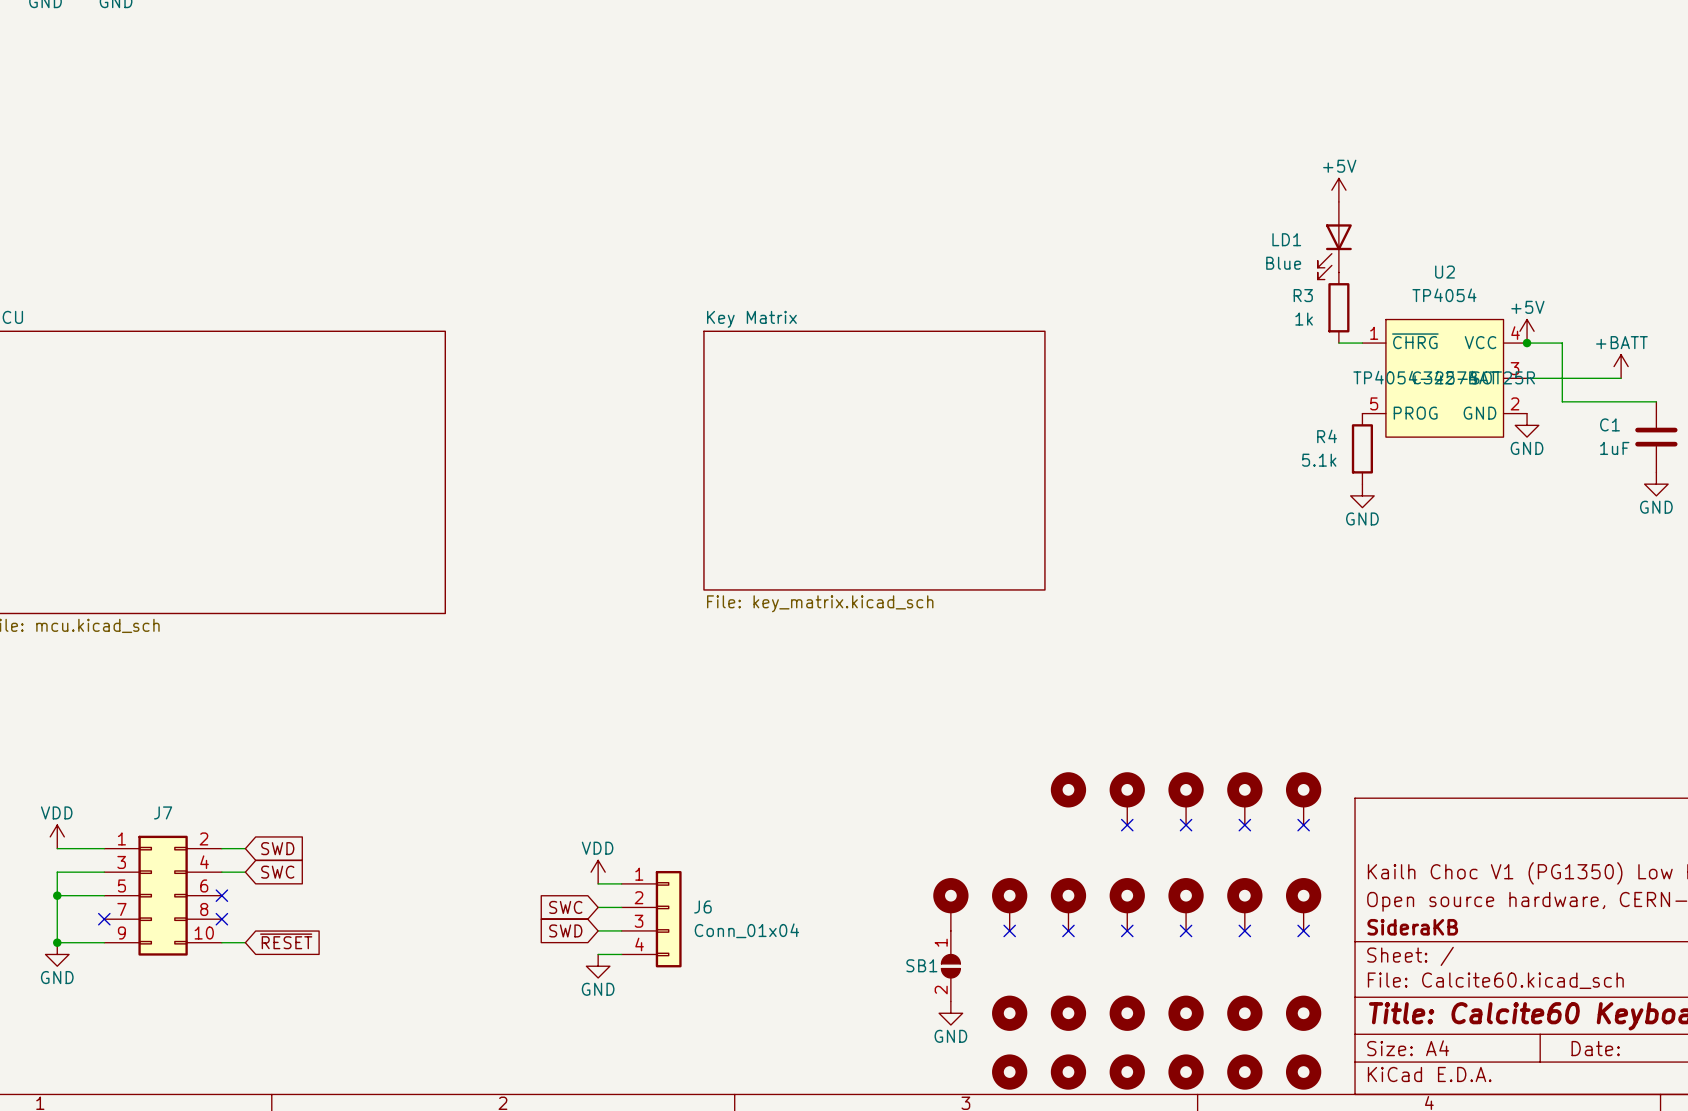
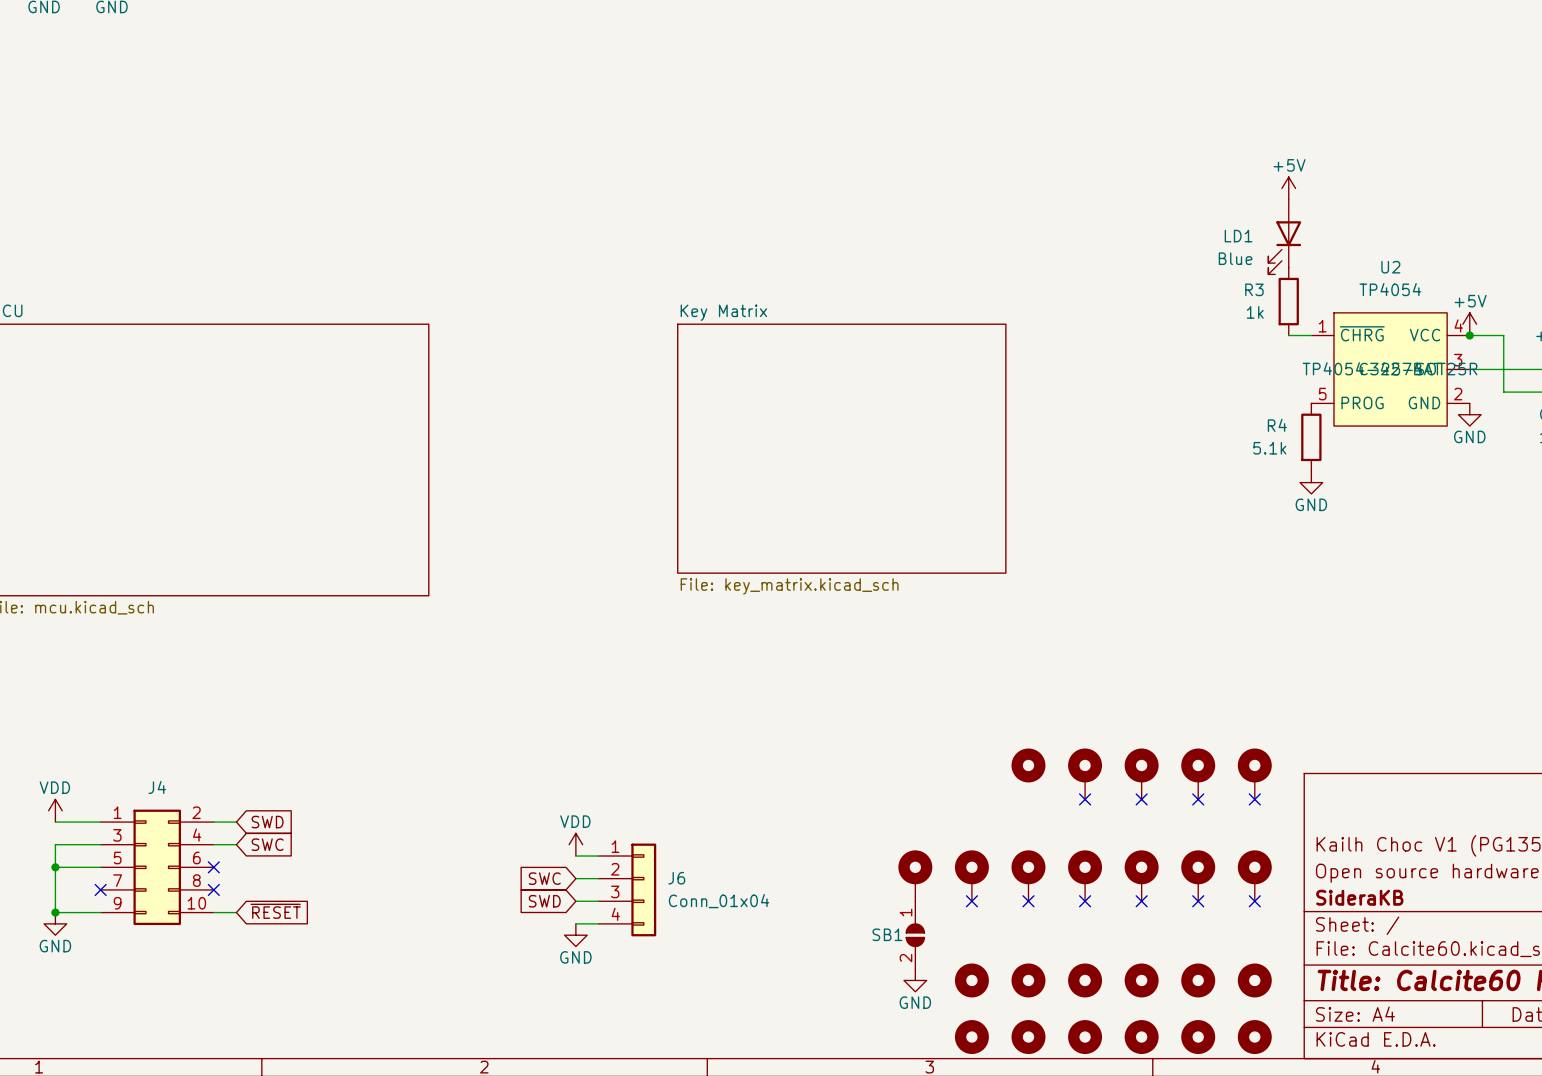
J7 name: J7 (163, 812) -> J4 (157, 787)

